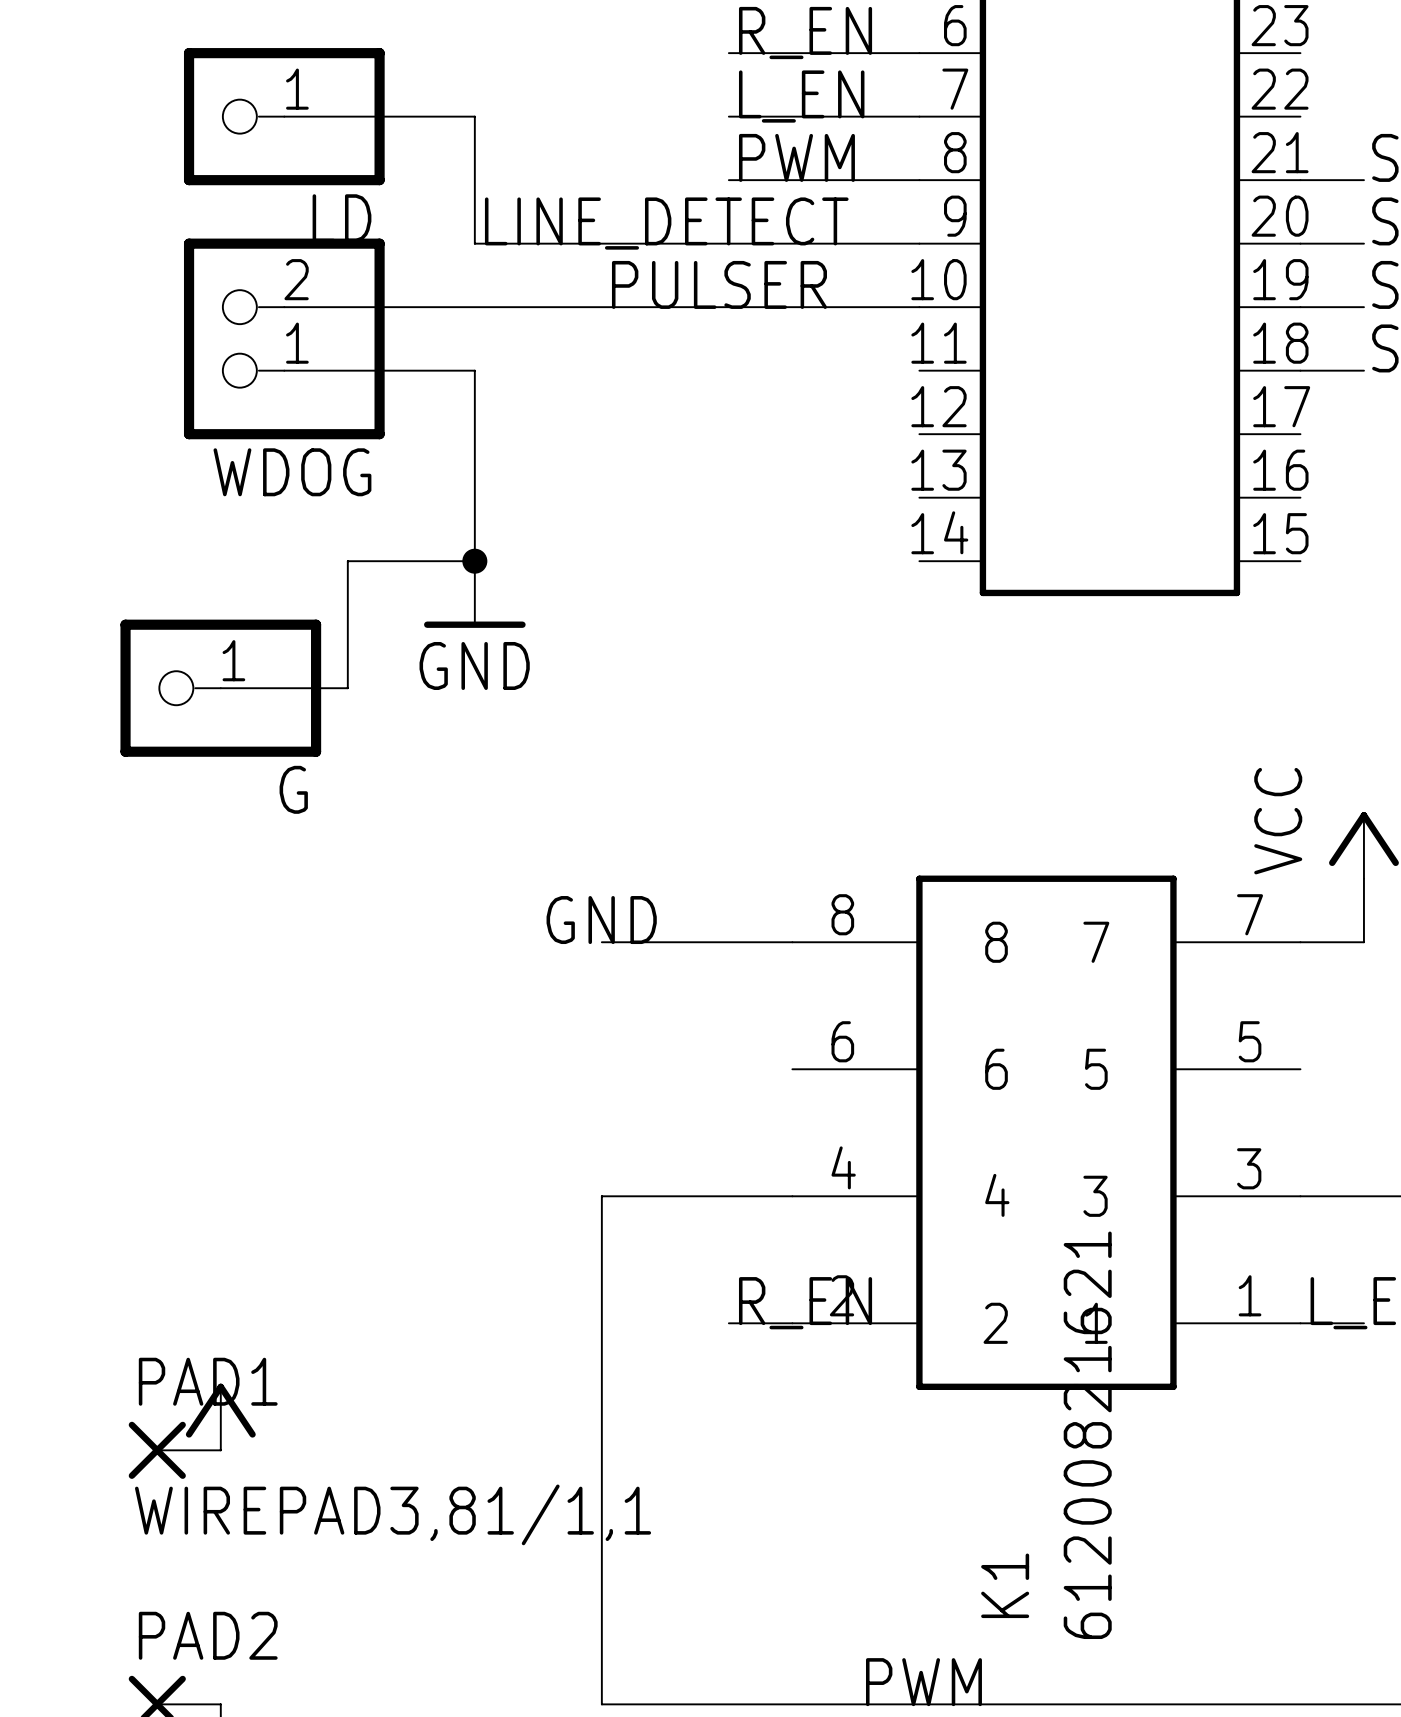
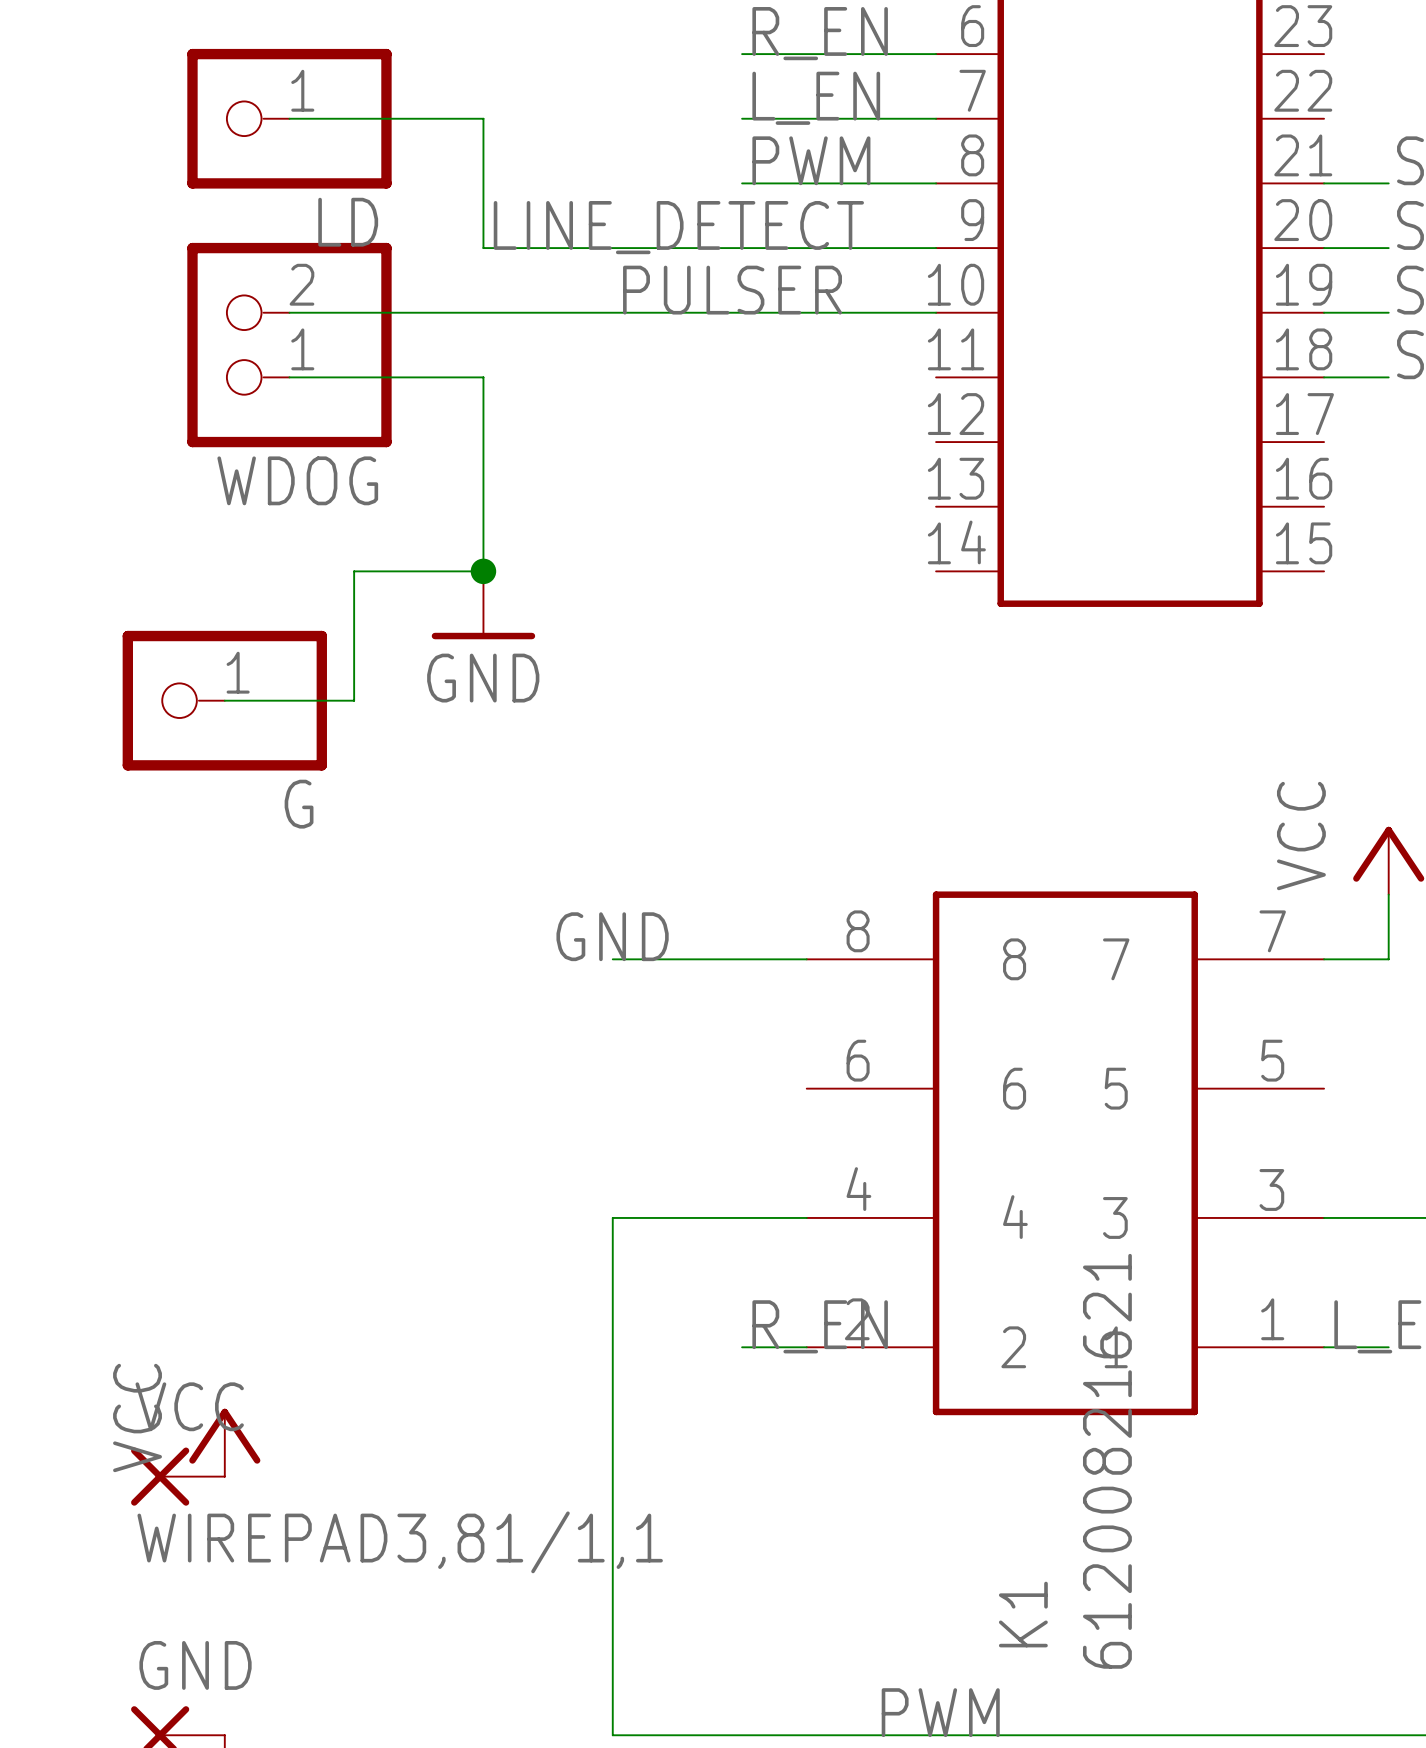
PAD1 name: PAD1 (208, 1381) -> VCC (189, 1406)
power symbol text: none -> VCC (137, 1417)
PAD2 name: PAD2 (208, 1635) -> GND (195, 1665)

